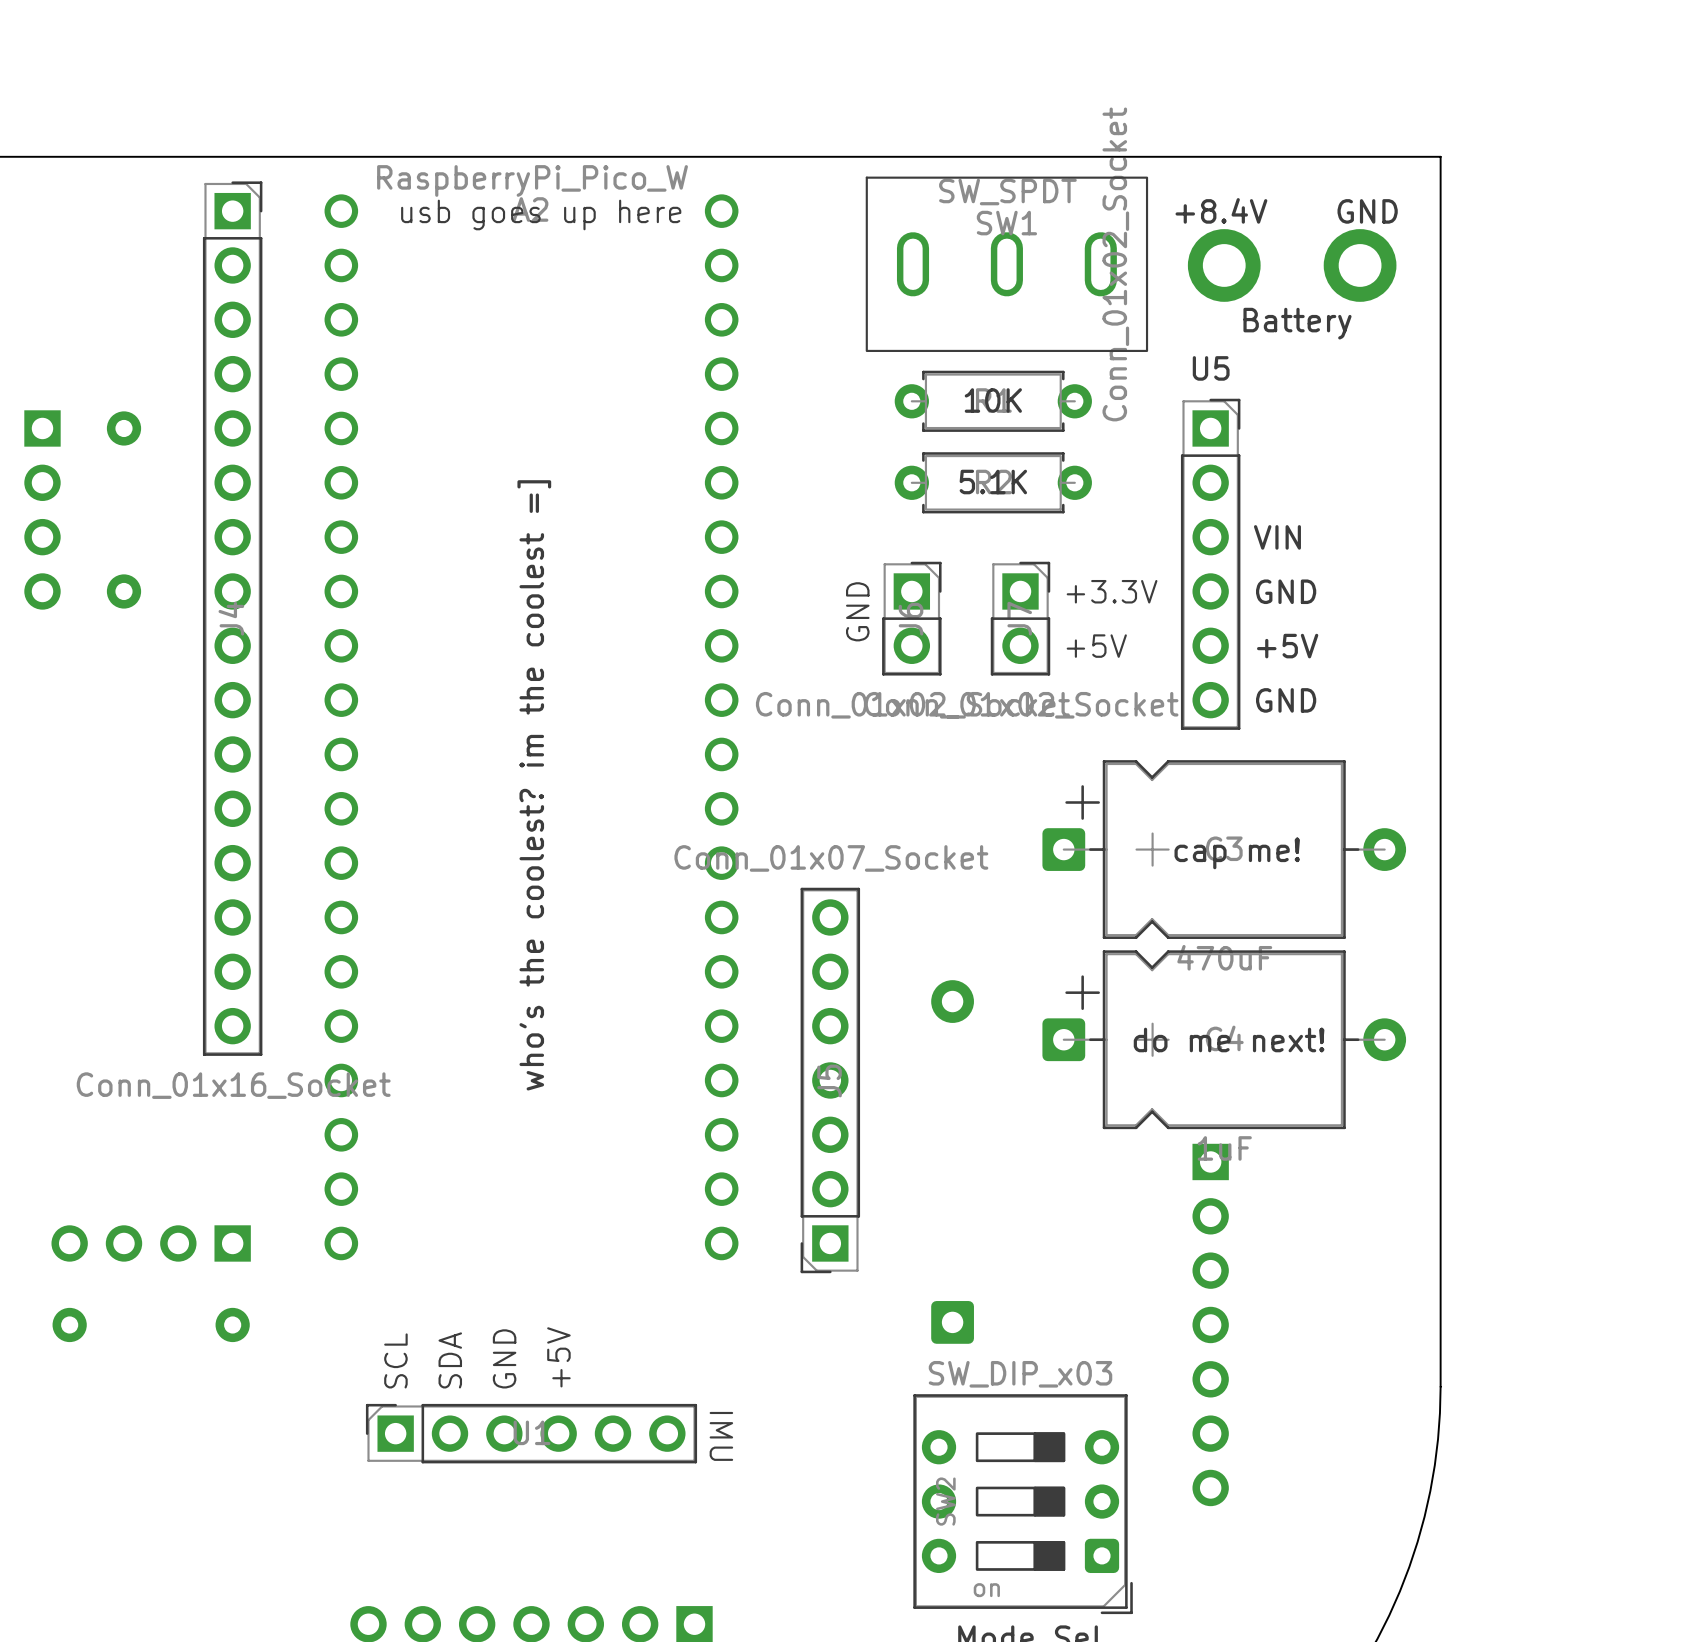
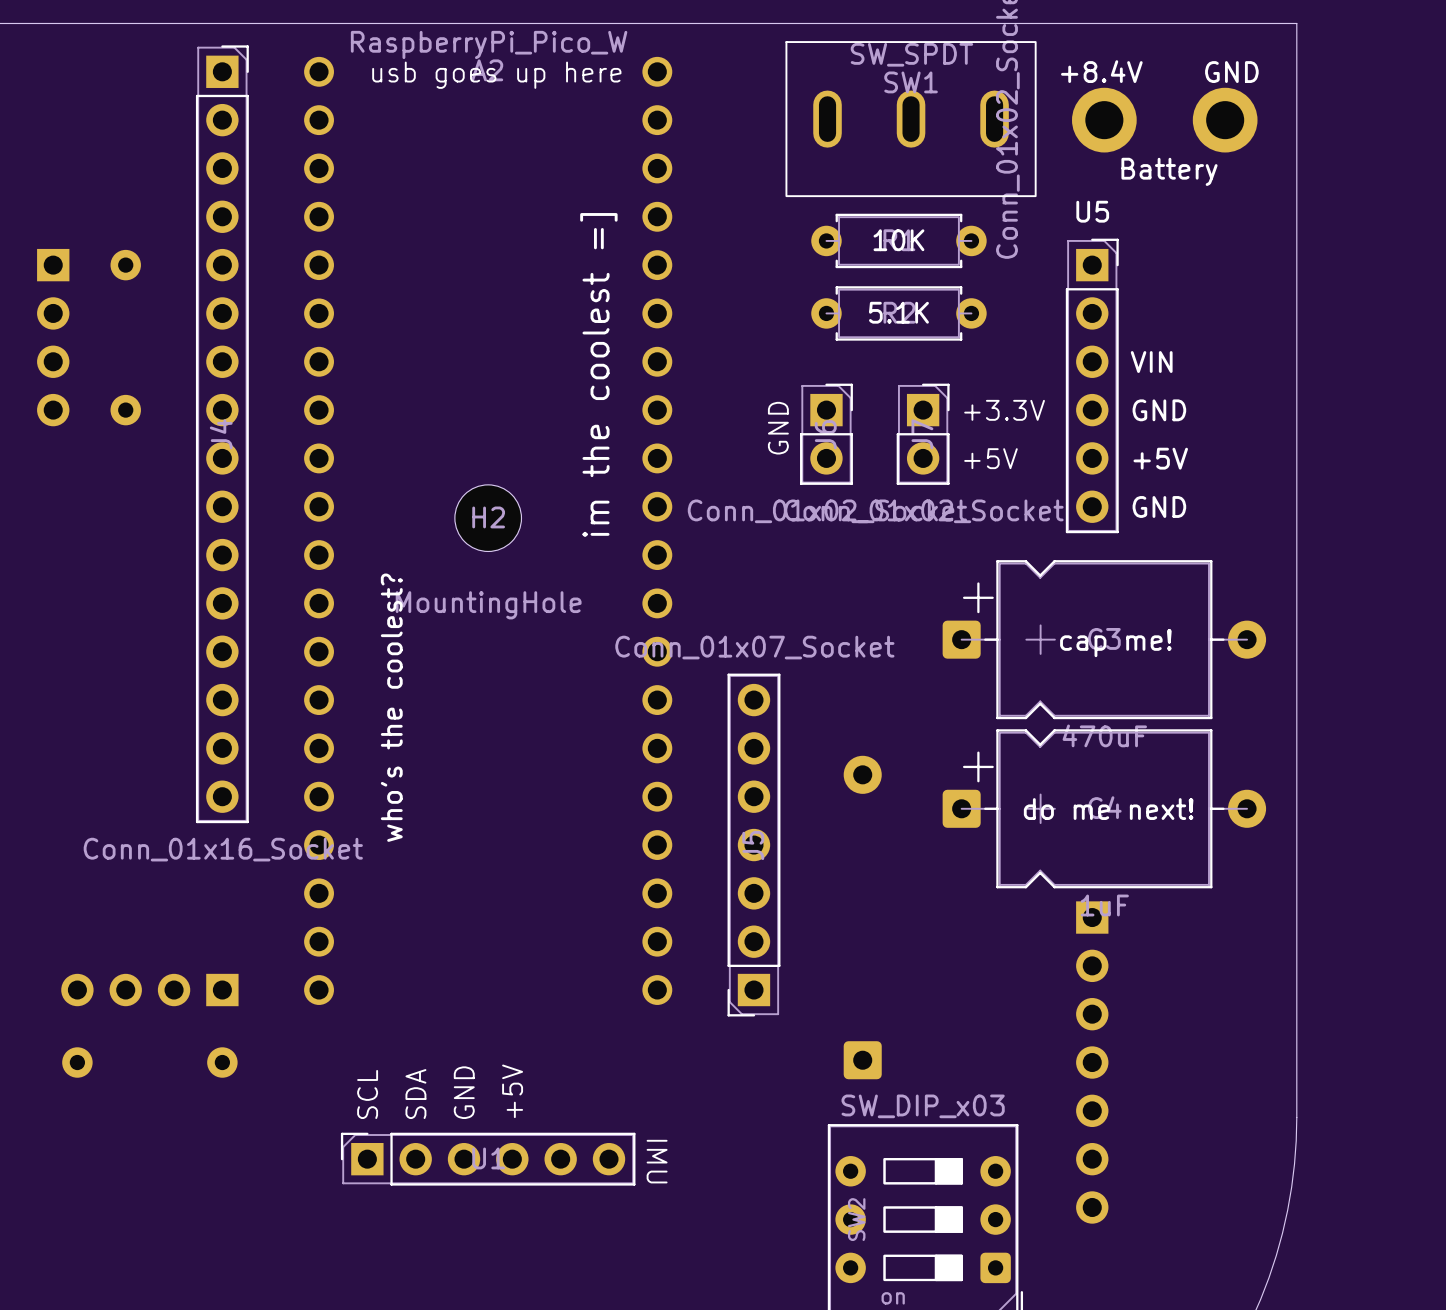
text: none -> im the coolest =] (598, 375)
H2: none -> MountingHole (488, 518)
text: who's the coolest? im the coolest =] (534, 785) -> none
text: none -> who's the coolest? (391, 707)

